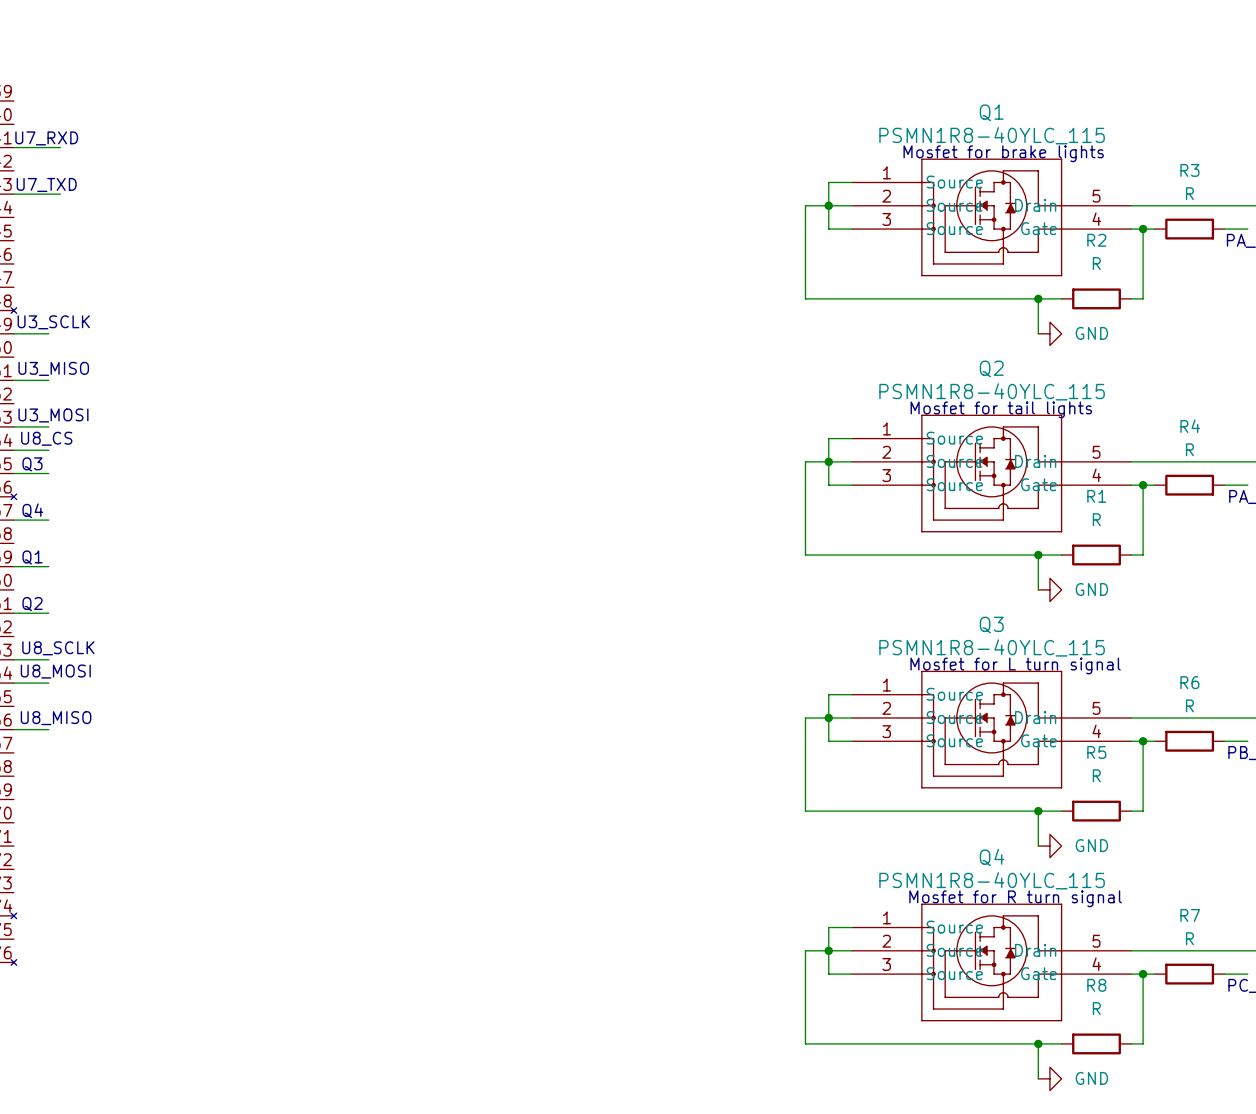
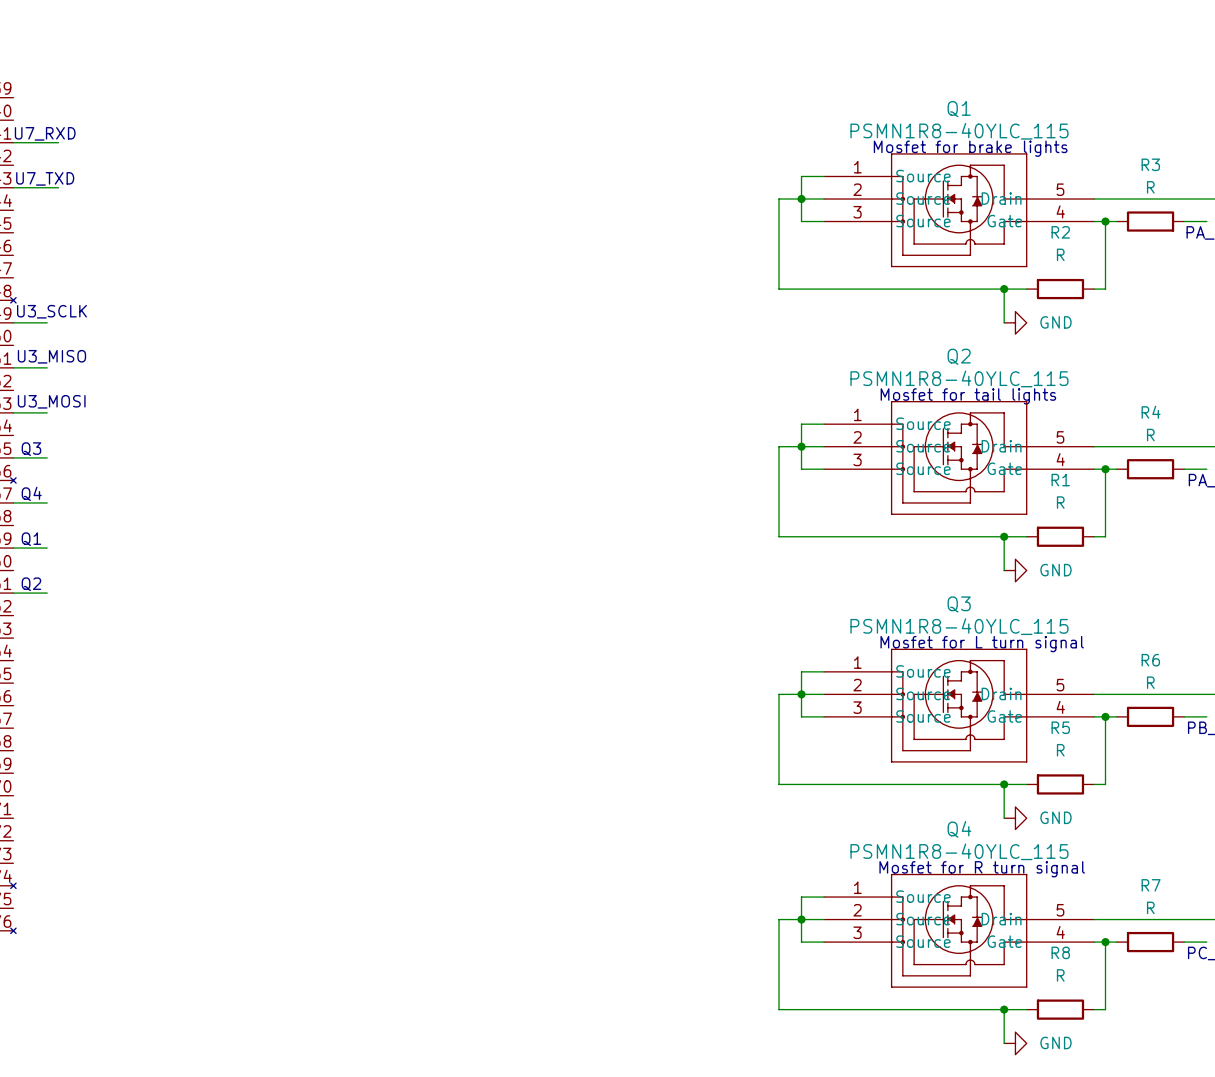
text: U8_CS (46, 438) -> none
wire: (13, 450) (48, 450) -> none
text: U8_SCLK (58, 648) -> none
wire: (13, 659) (48, 659) -> none
text: U8_MOSI (55, 671) -> none
wire: (13, 683) (48, 683) -> none
text: U8_MISO (56, 718) -> none
wire: (13, 729) (48, 729) -> none

